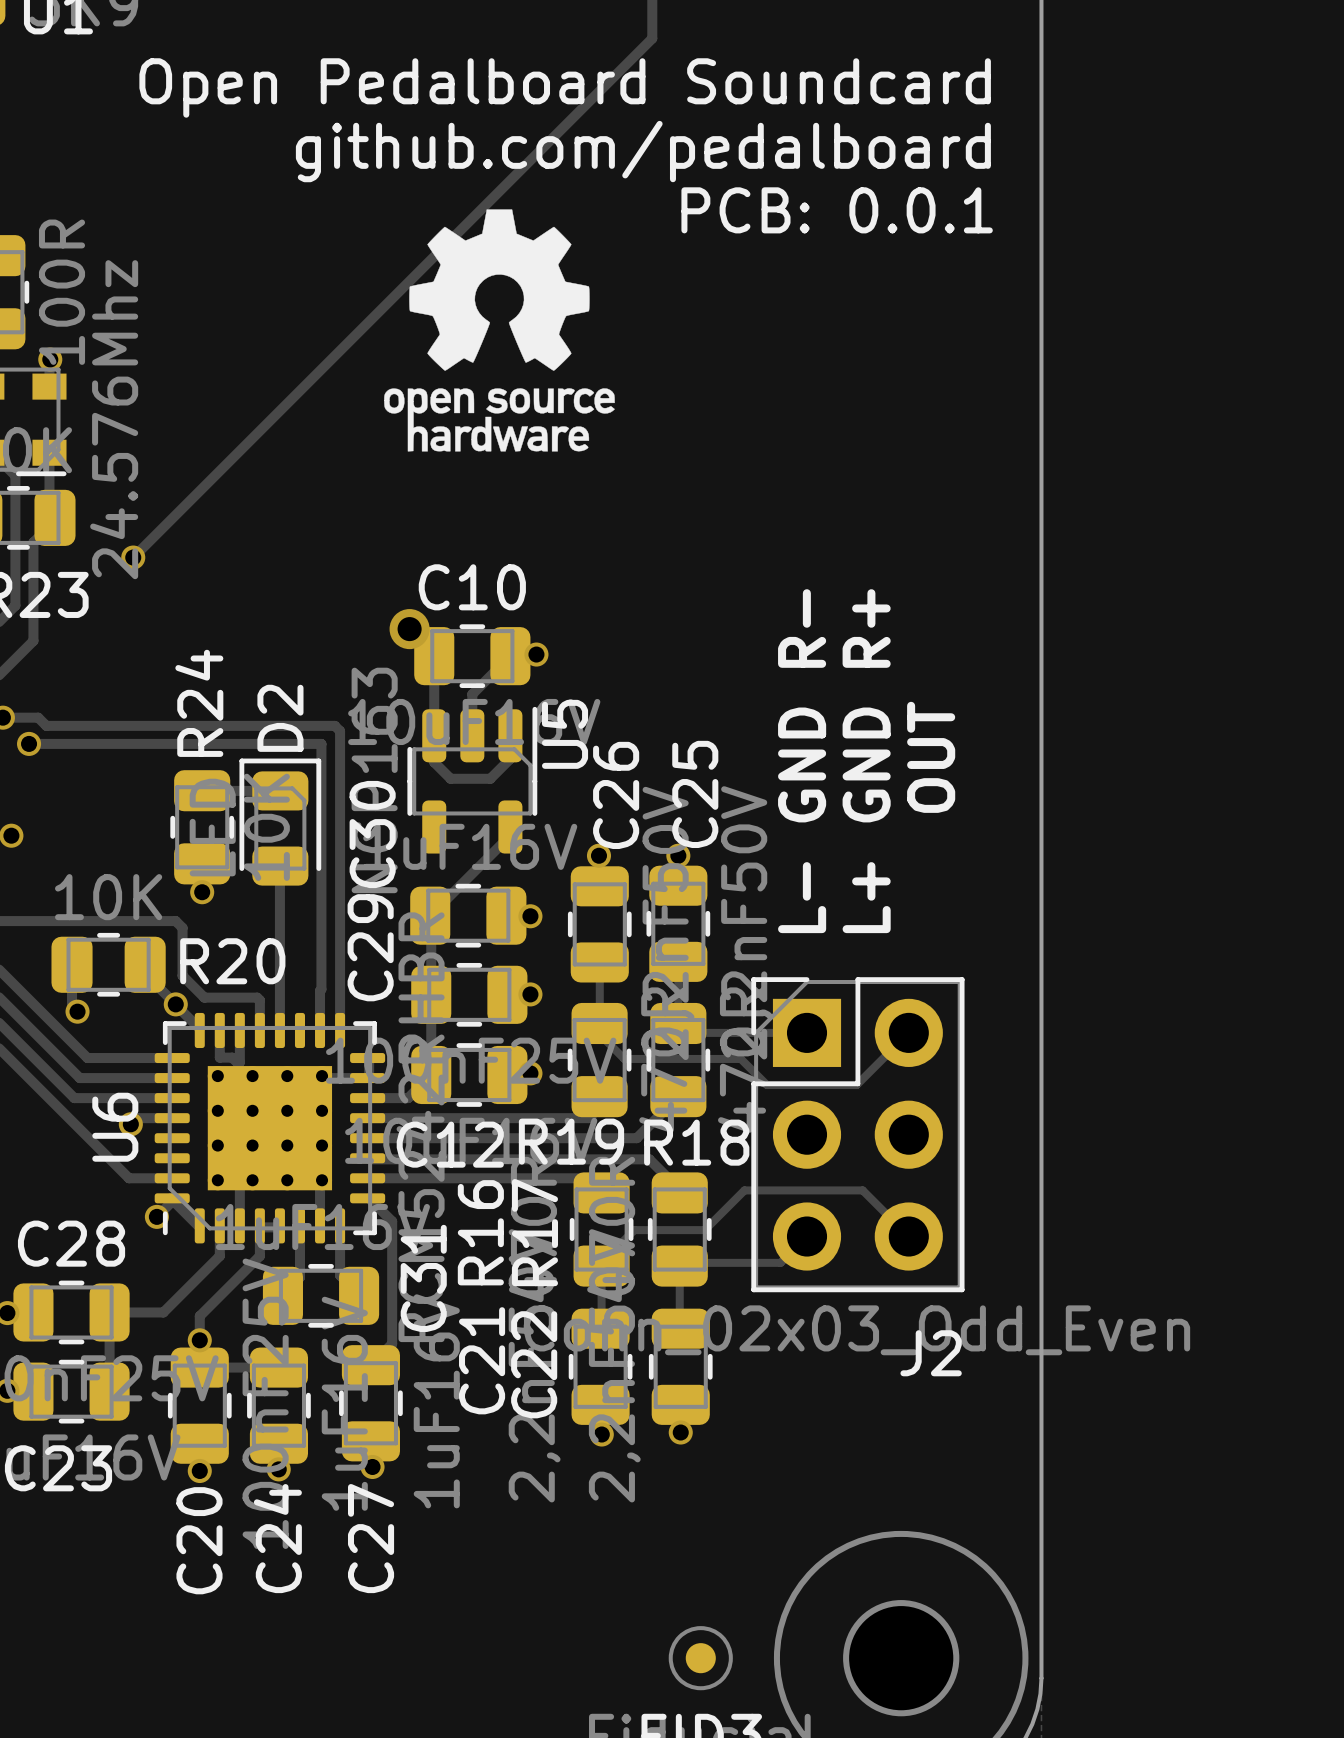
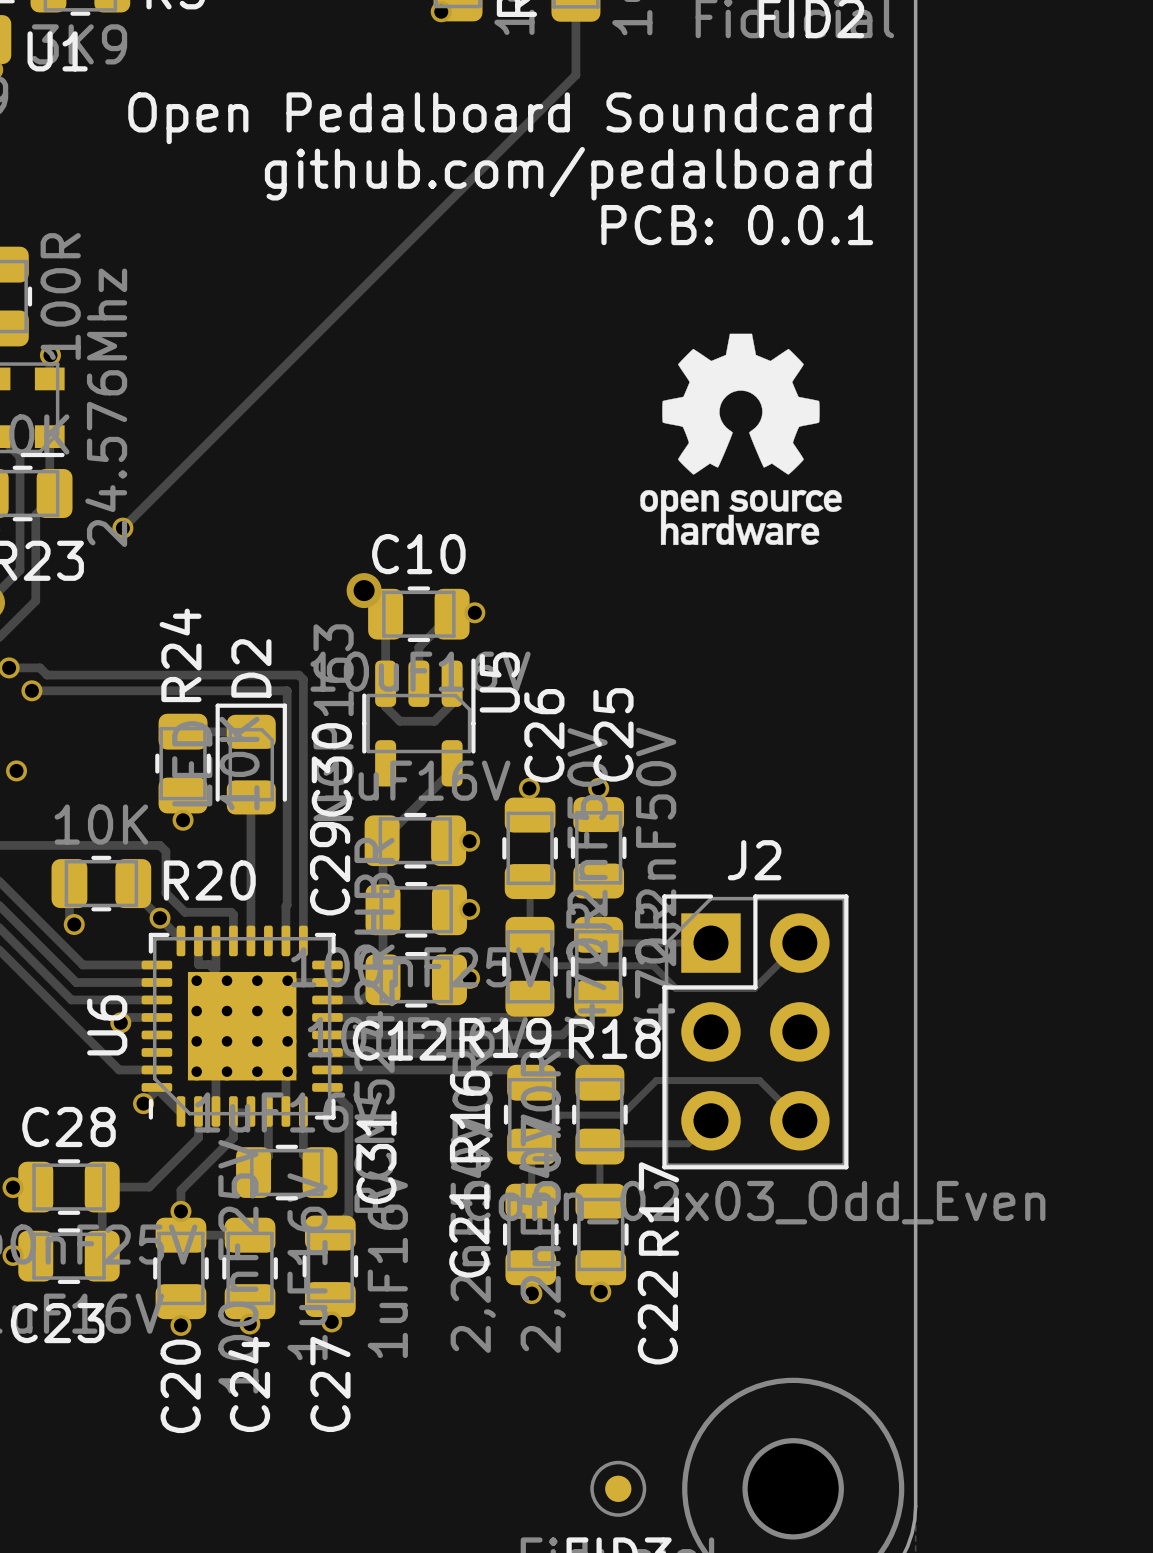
drawing position: (499, 330) -> (740, 439)
text: OUT (931, 757) -> none
text: L- GND R- (802, 761) -> none
text: L+ GND R+ (866, 761) -> none
R16 name position: R16 (480, 1232) -> R16 (470, 1116)
R17 name position: R17 (534, 1232) -> R17 (658, 1209)
J2 name position: J2 (931, 1353) -> J2 (754, 860)
C21 name position: C21 (482, 1360) -> C21 (469, 1230)
C22 name position: C22 (534, 1364) -> C22 (657, 1317)

